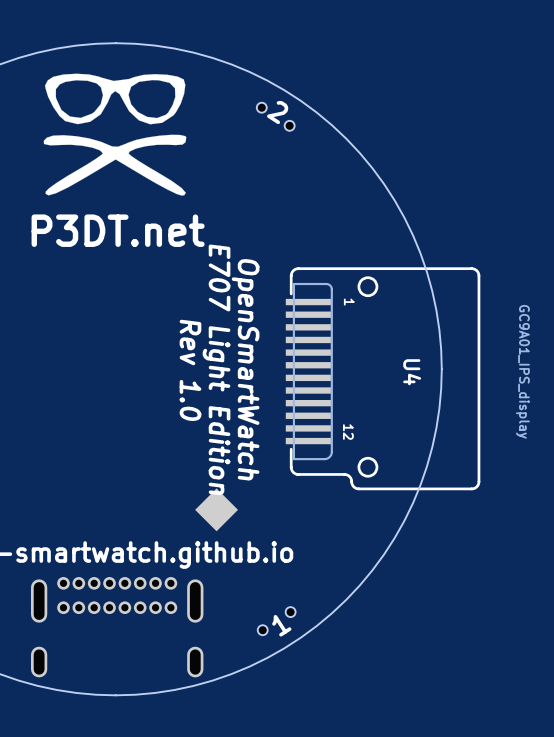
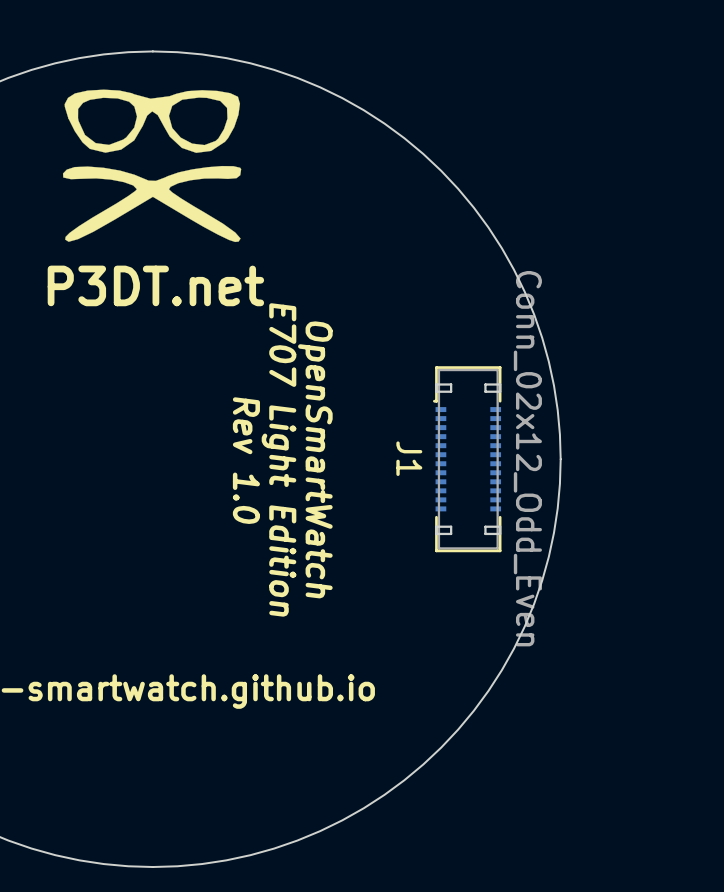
text: 2 (277, 112) -> none
part: (275, 116) -> none
J1: none -> Conn_02x12_Odd_Even (467, 459)
U4: GC9A01_IPS_display (383, 378) -> none
part: (216, 509) -> none
part: (276, 621) -> none
text: 1 (281, 625) -> none
part: (117, 627) -> none

